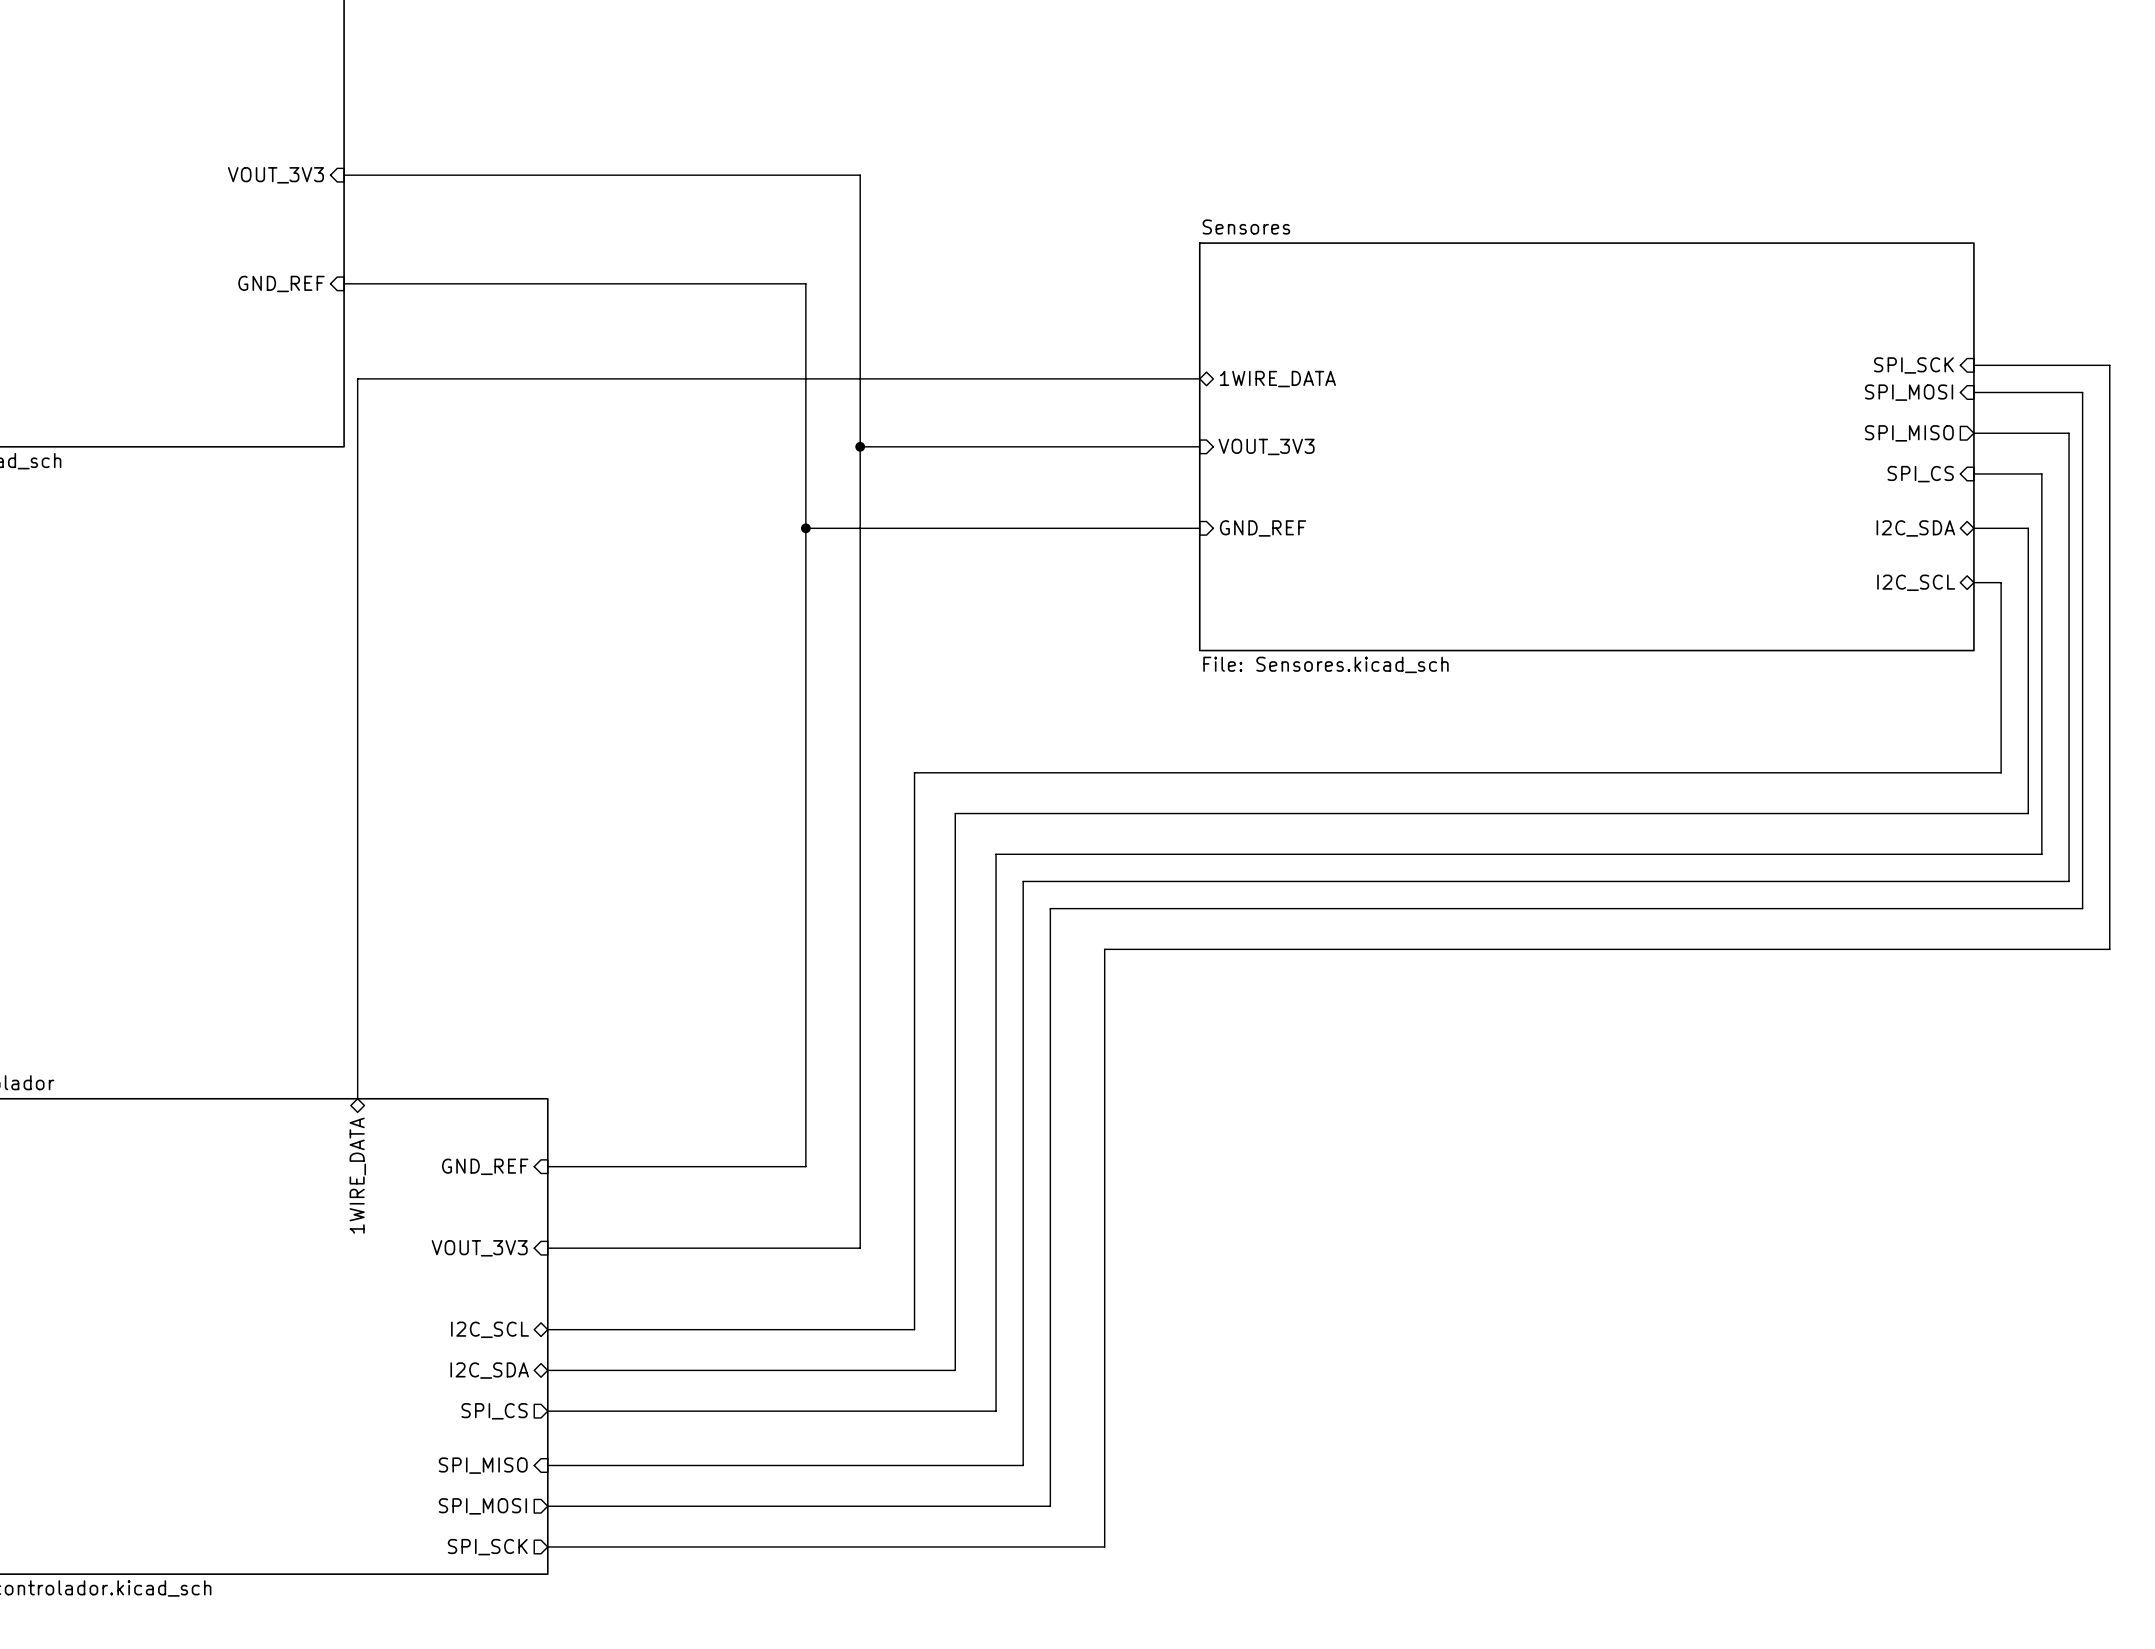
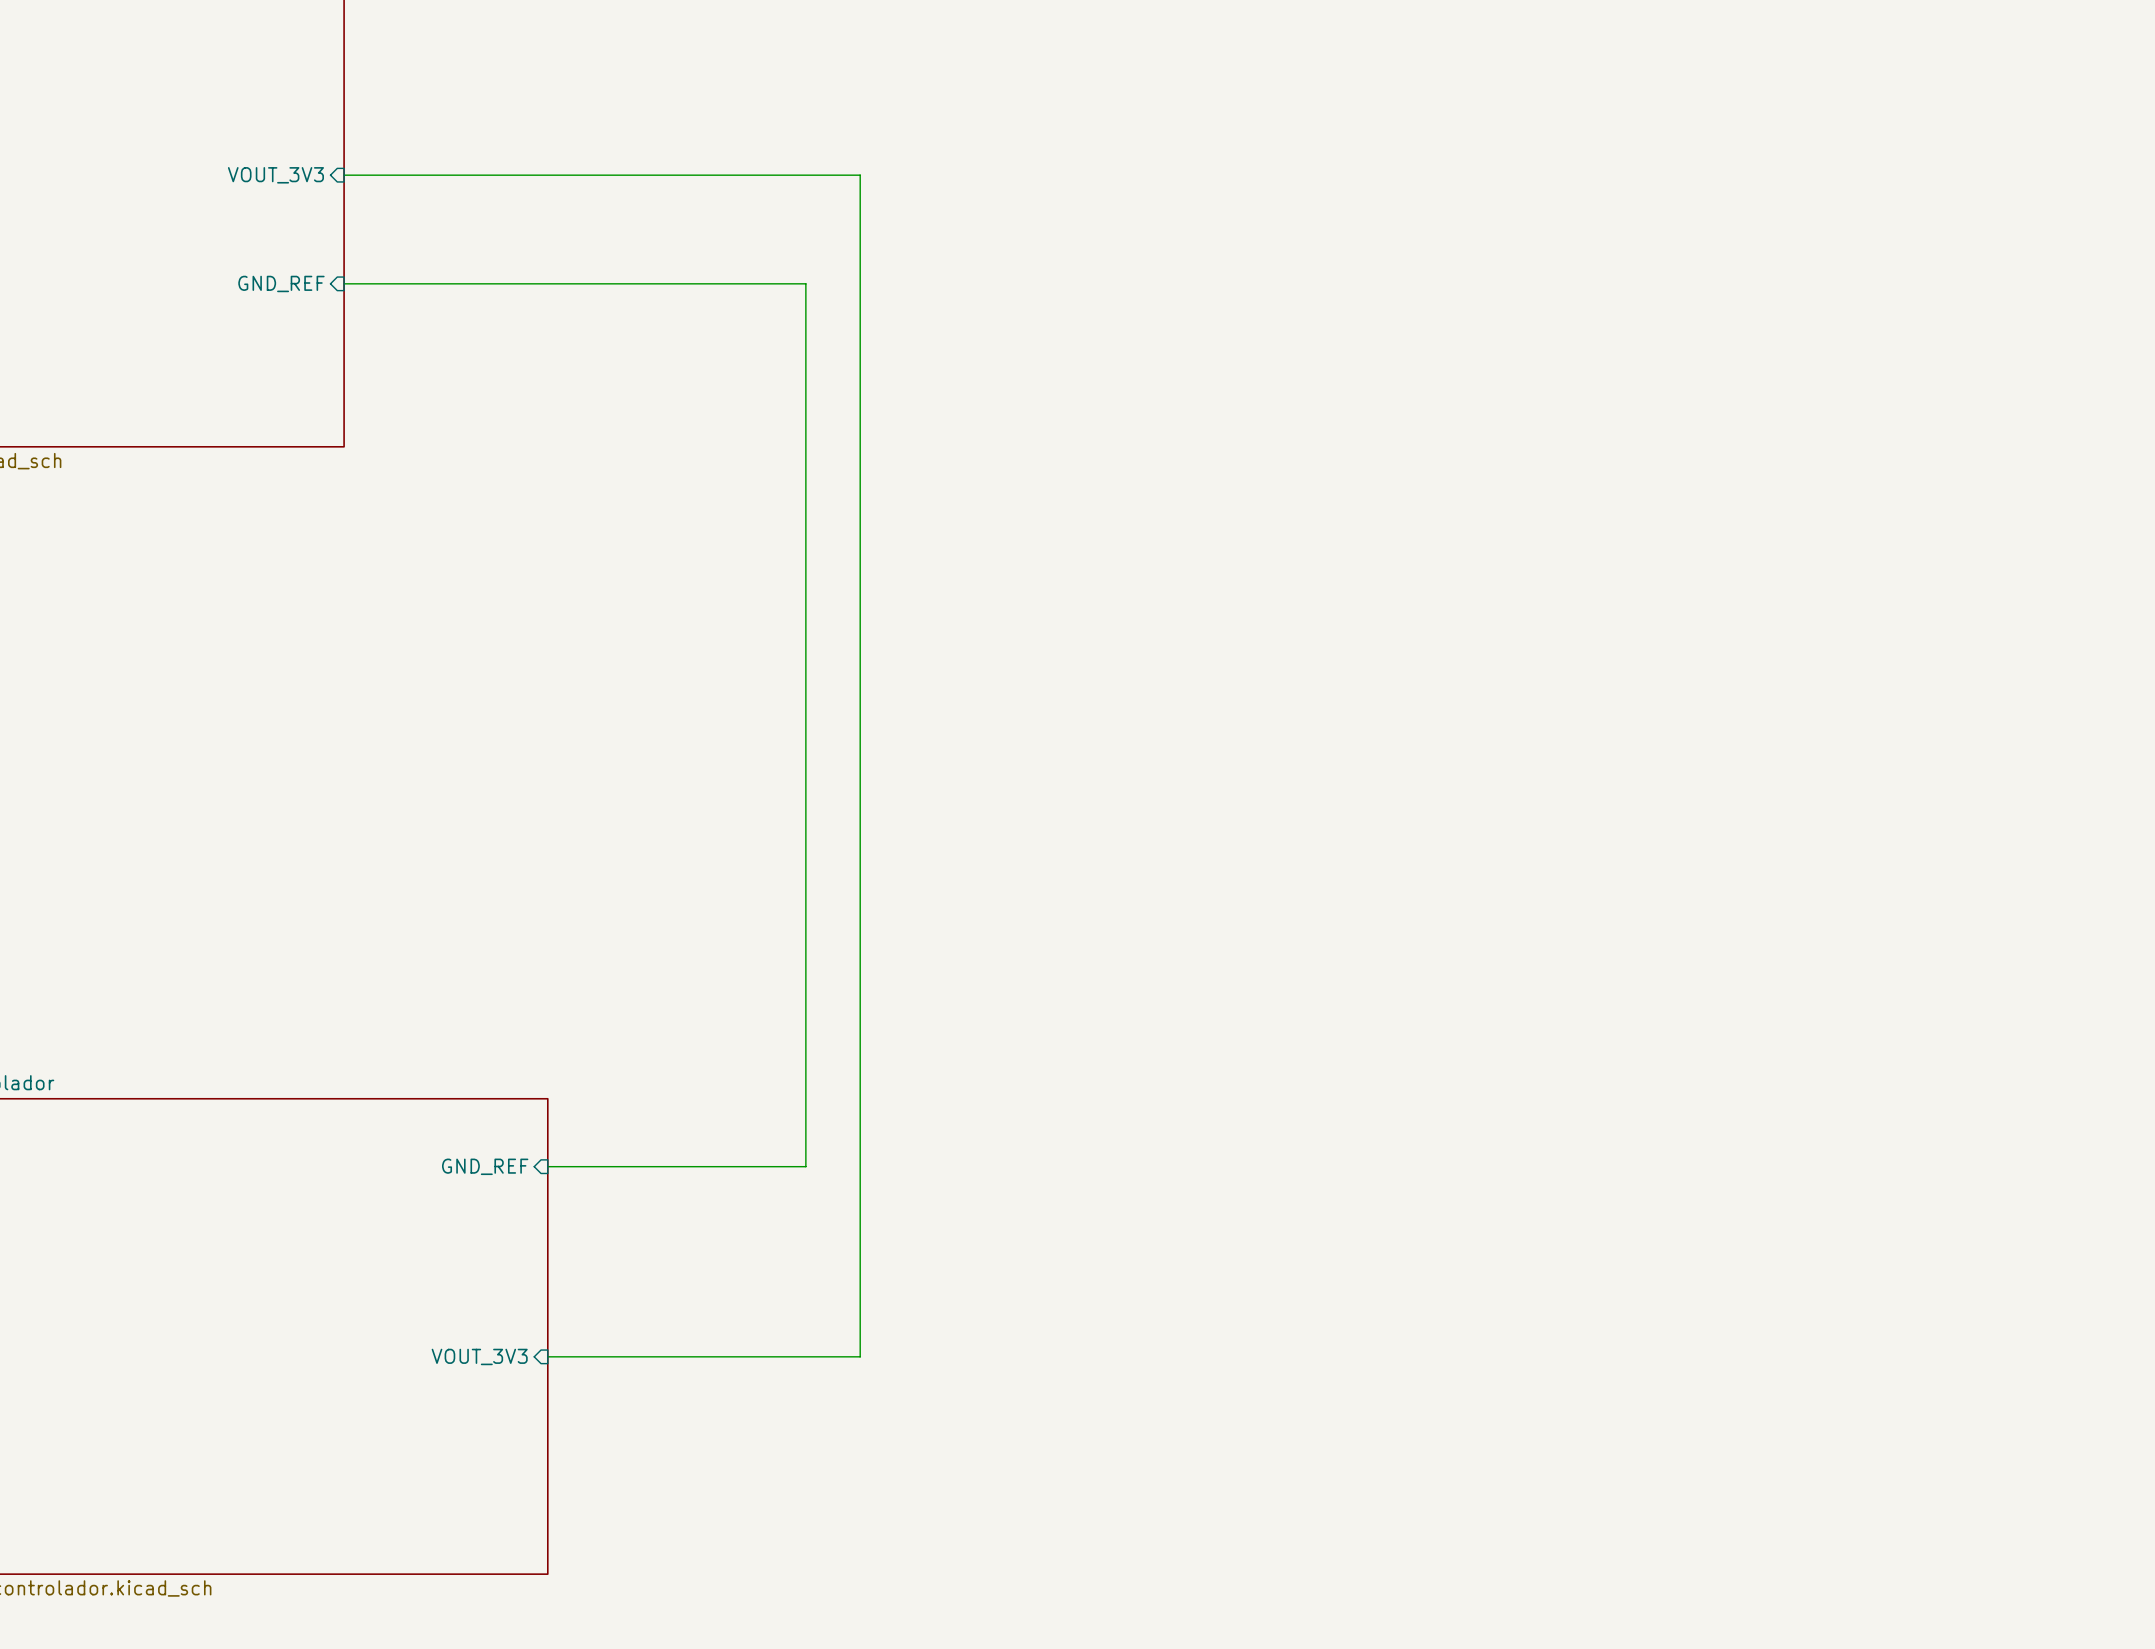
sheet pin: SPI_SCK (1913, 365) -> none
wire: (1973, 365) (2109, 365) (2109, 949) (1104, 949) (1104, 1546) (547, 1546) -> none
wire: (1199, 378) (357, 378) (357, 1098) -> none
sheet pin: 1WIRE_DATA (1277, 379) -> none
sheet pin: SPI_MOSI (1909, 392) -> none
wire: (1973, 392) (2082, 392) (2082, 908) (1050, 908) (1050, 1506) (547, 1506) -> none
sheet pin: SPI_MISO (1909, 433) -> none
wire: (1973, 433) (2069, 433) (2069, 881) (1023, 881) (1023, 1465) (547, 1465) -> none
wire: (860, 446) (1199, 446) -> none
junction: (860, 446) -> none
sheet pin: VOUT_3V3 (1266, 446) -> none
sheet Sensores: File: Sensores.kicad_sch (1586, 446) -> none
wire: (1973, 473) (2041, 473) (2041, 854) (996, 854) (996, 1411) (547, 1411) -> none
sheet pin: SPI_CS (1920, 474) -> none
wire: (805, 528) (1199, 528) -> none
junction: (805, 528) -> none
sheet pin: GND_REF (1263, 528) -> none
sheet pin: I2C_SDA (1915, 528) -> none
wire: (1973, 528) (2028, 528) (2028, 813) (955, 813) (955, 1370) (547, 1370) -> none
sheet pin: I2C_SCL (1916, 582) -> none
wire: (1973, 582) (2001, 582) (2001, 772) (914, 772) (914, 1329) (547, 1329) -> none
sheet pin: 1WIRE_DATA (357, 1175) -> none
sheet pin position: VOUT_3V3 (479, 1248) -> VOUT_3V3 (479, 1356)
wire: (547, 1248) (860, 1248) -> (547, 1356) (860, 1356) (860, 1248)
sheet pin: I2C_SCL (490, 1329) -> none
sheet pin: I2C_SDA (489, 1370) -> none
sheet pin: SPI_CS (494, 1411) -> none
sheet pin: SPI_MISO (483, 1465) -> none
sheet pin: SPI_MOSI (482, 1506) -> none
sheet pin: SPI_SCK (487, 1547) -> none

